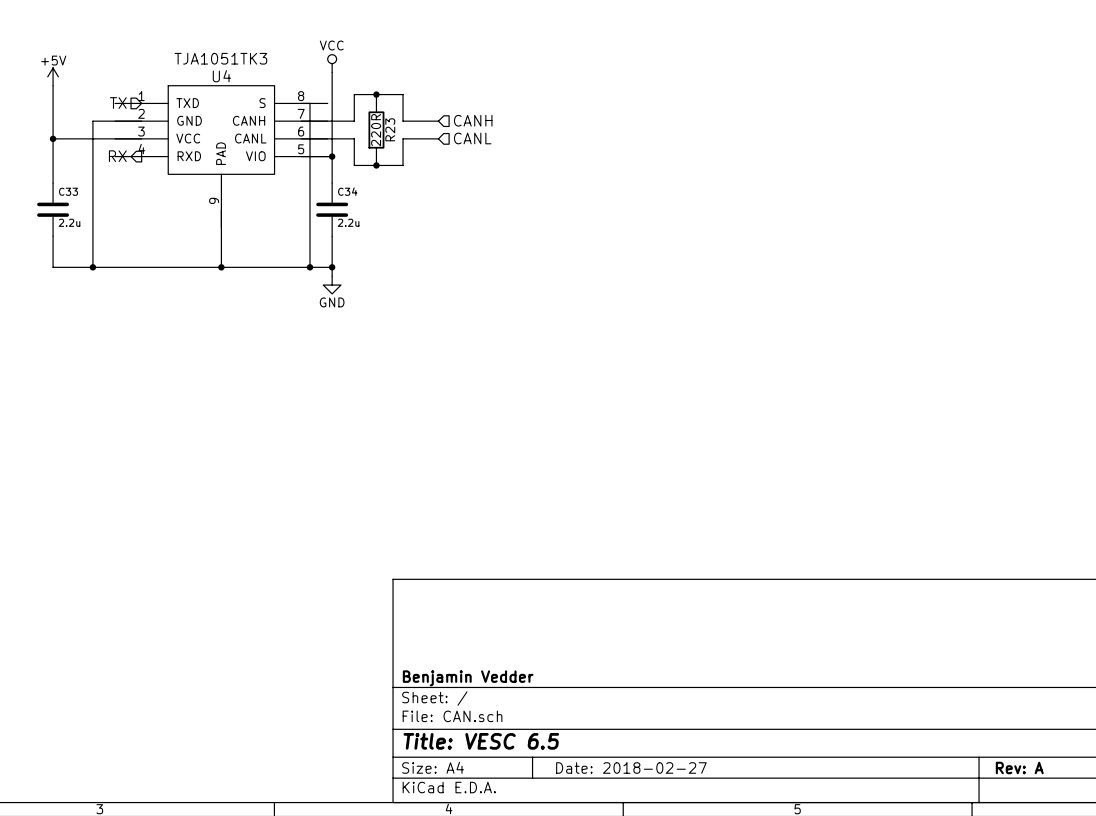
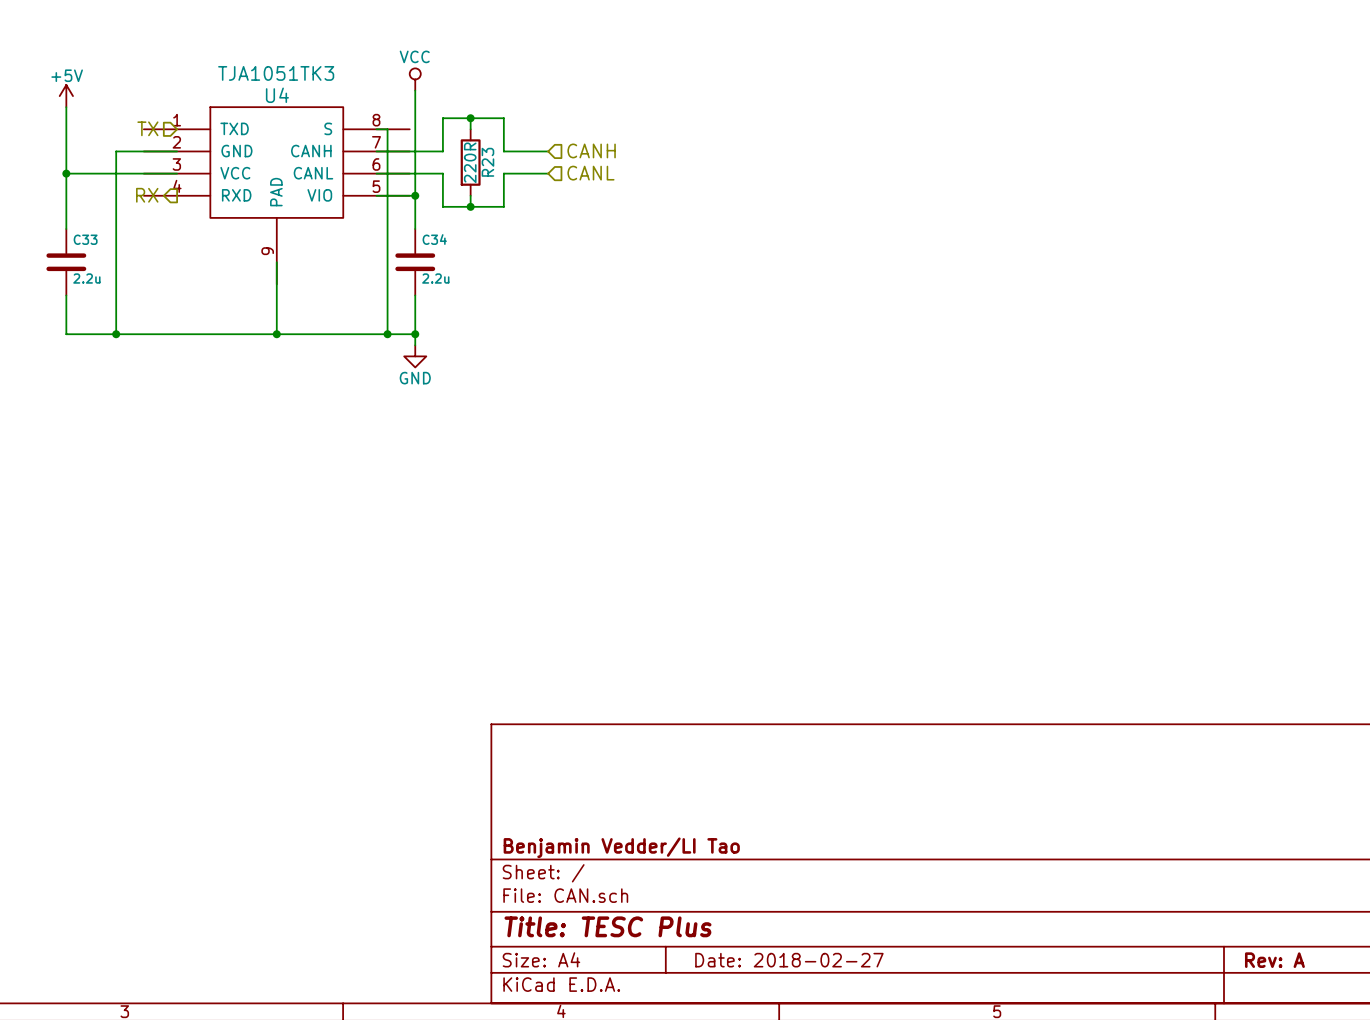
title block: Benjamin Vedder (468, 678) -> Benjamin Vedder/LI Tao (621, 847)
title block: Title: VESC 6.5 (481, 741) -> Title: TESC Plus (607, 926)

